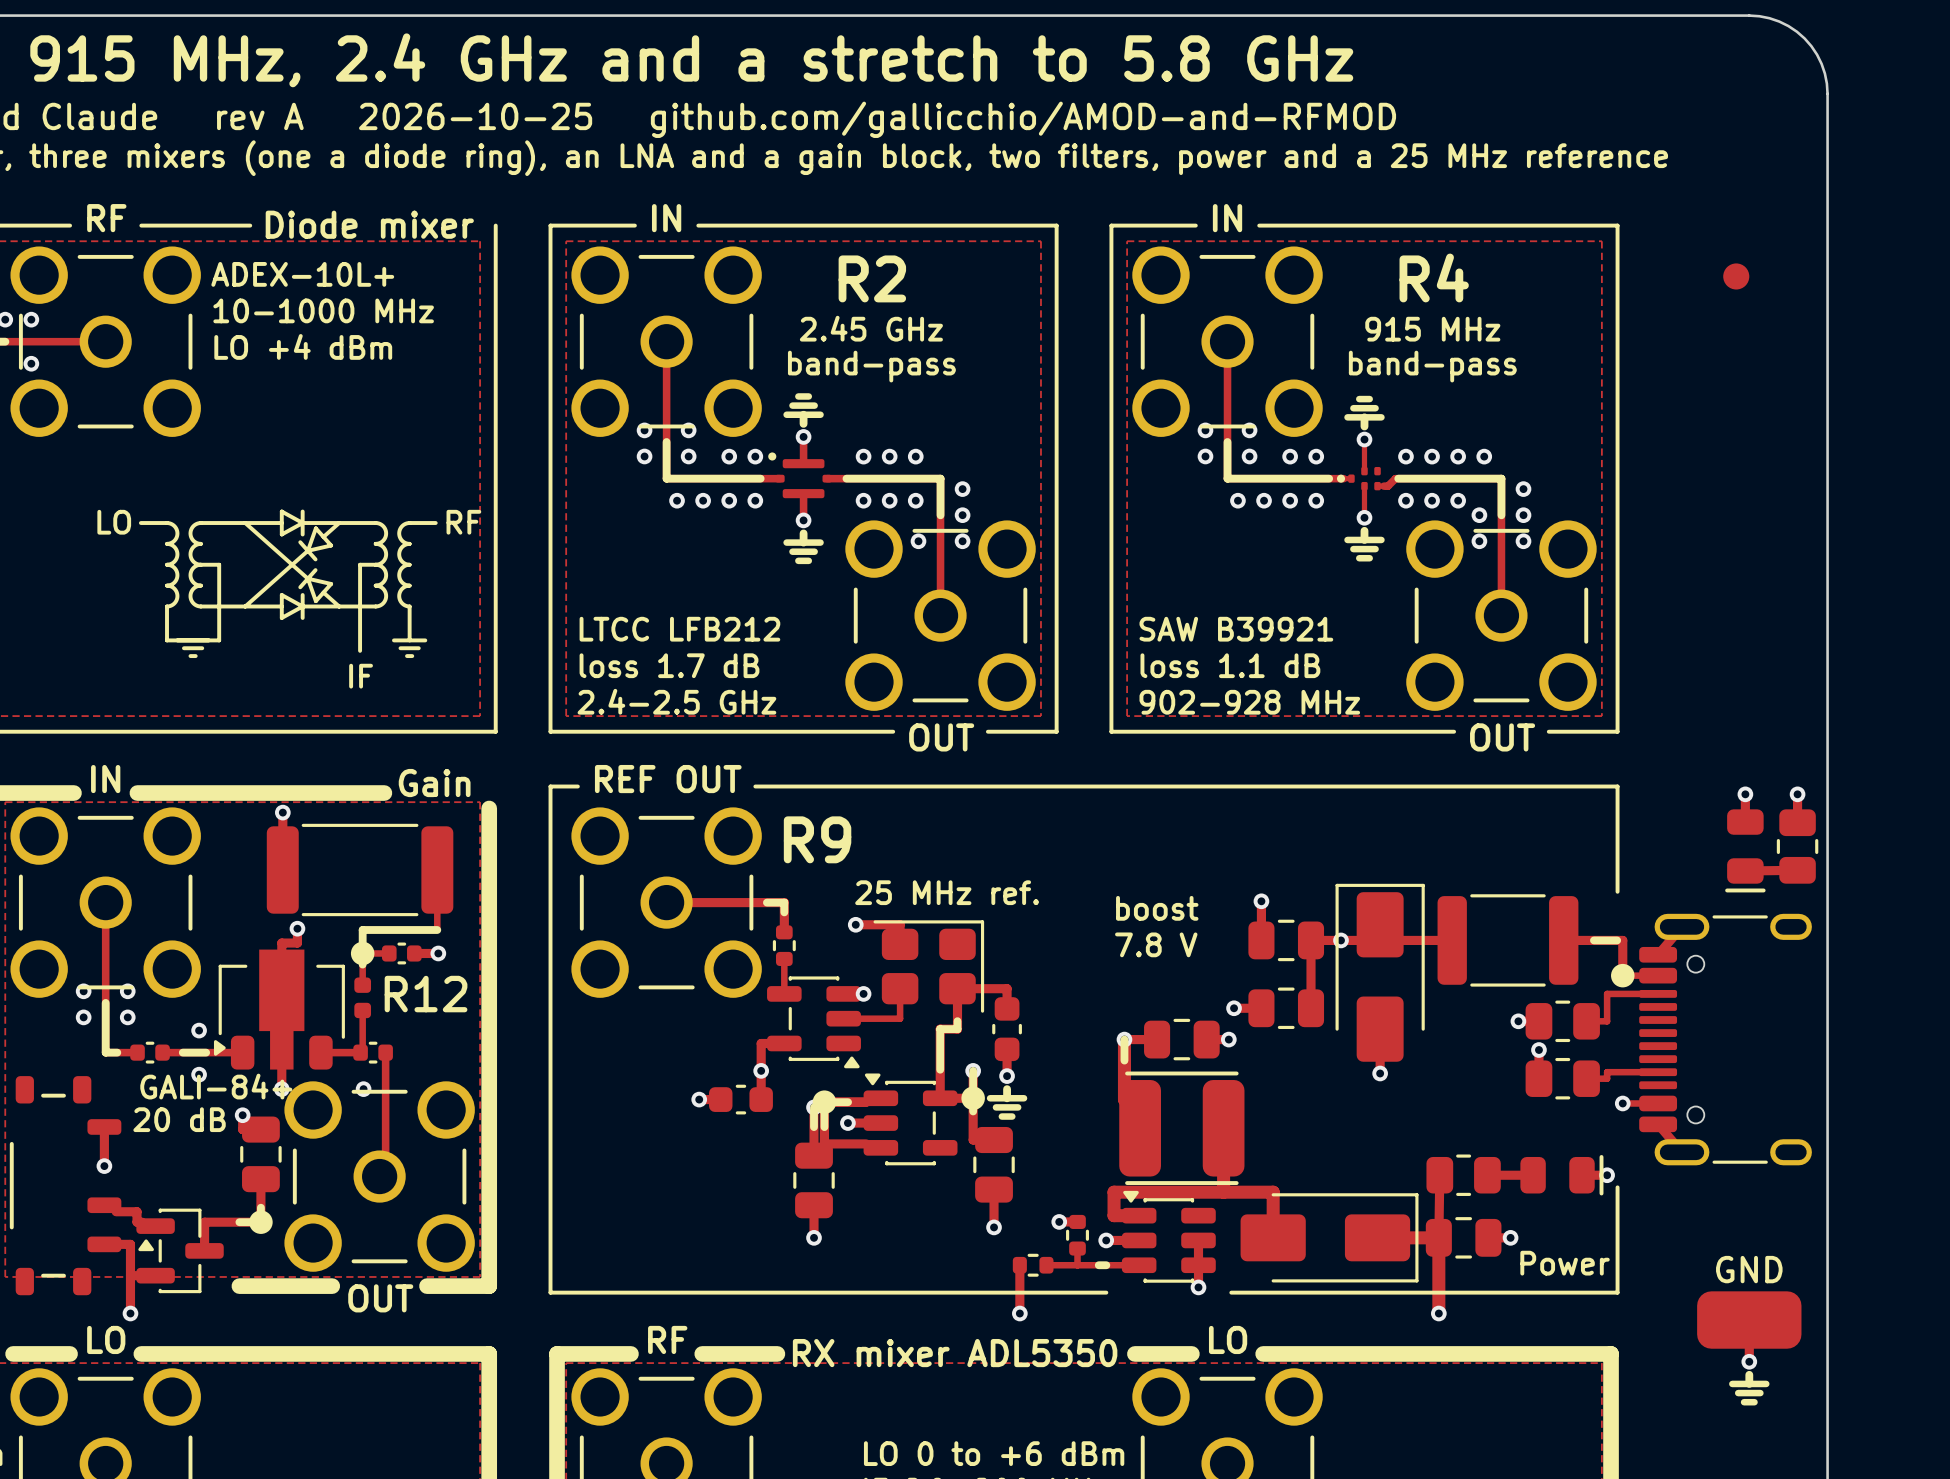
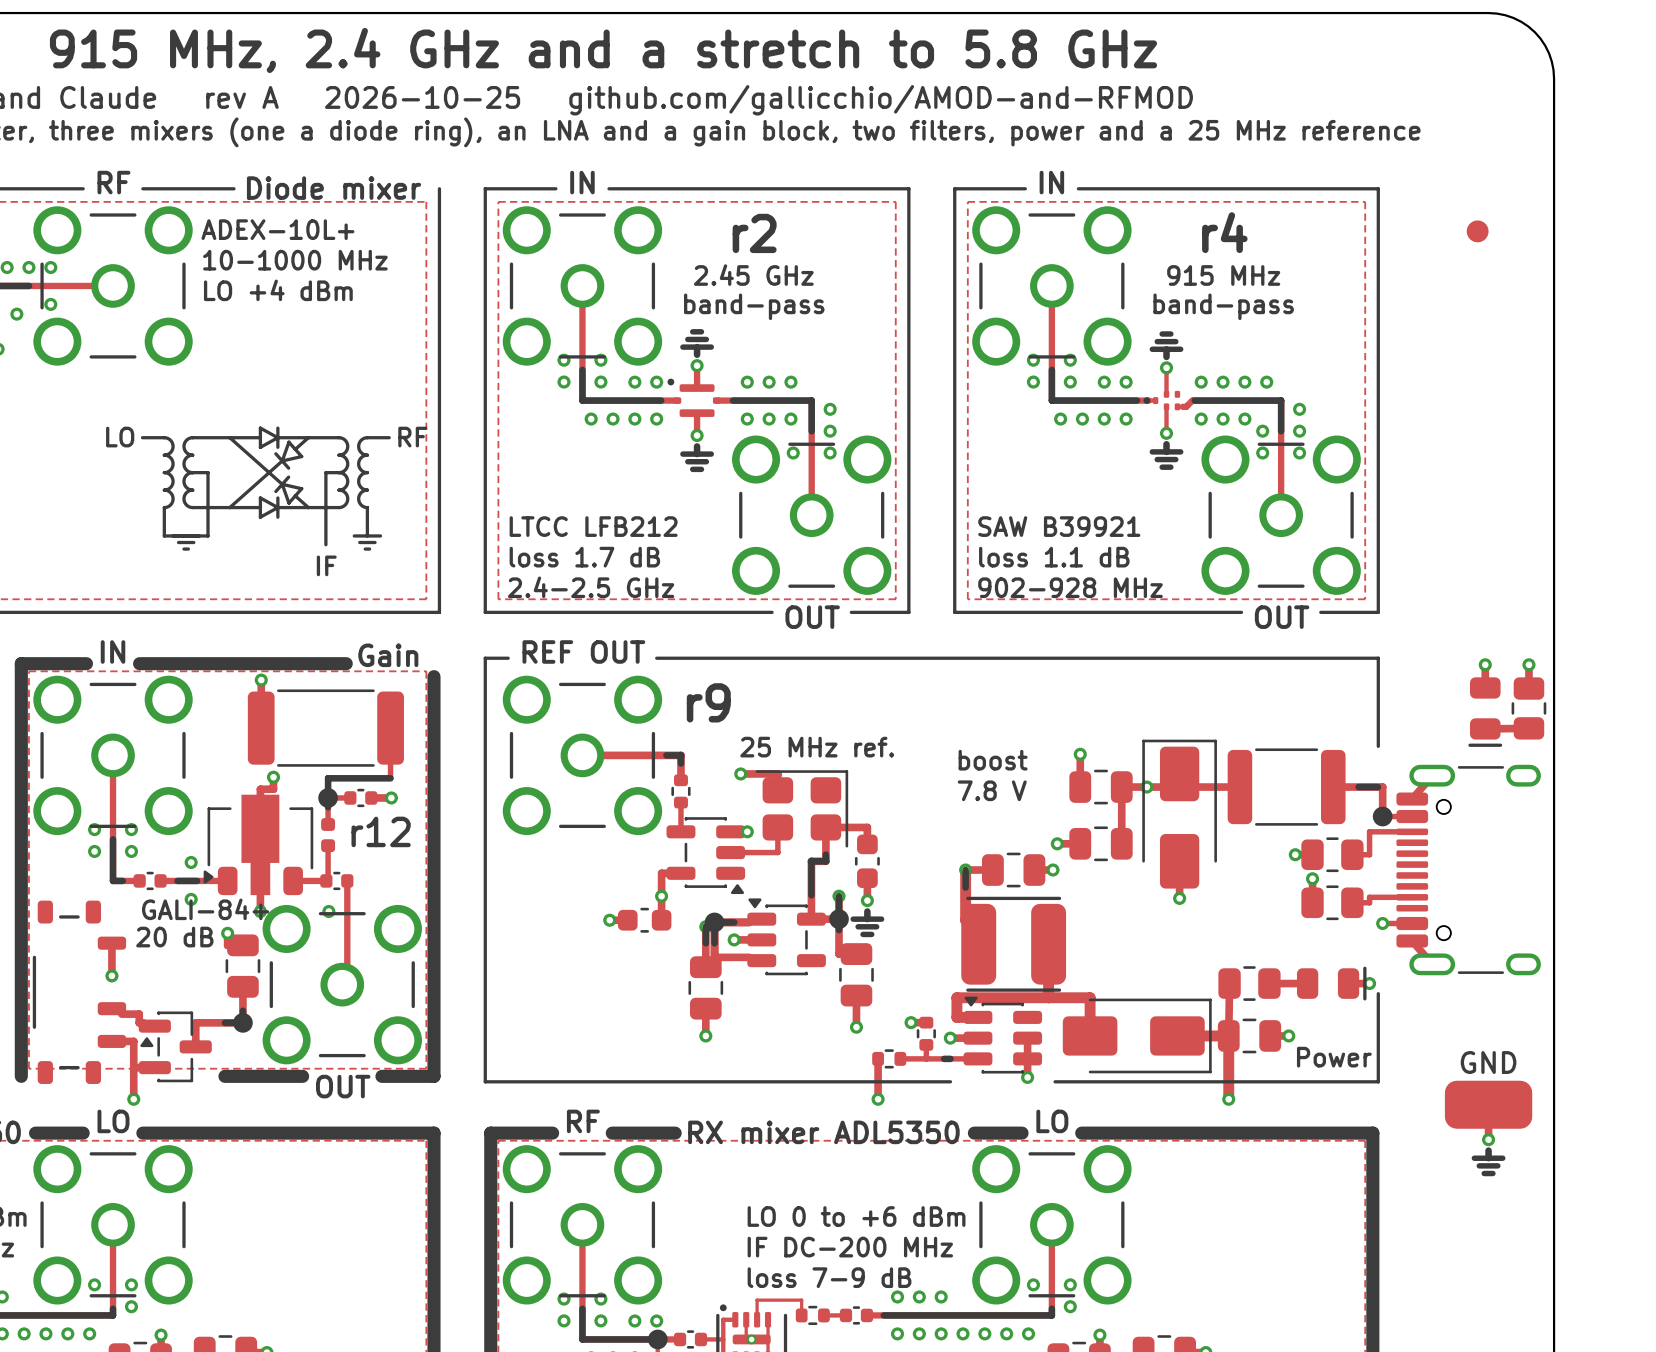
text: R4 (1434, 277) -> r4 (1224, 232)
text: R2 (872, 278) -> r2 (754, 233)
text: R9 (817, 839) -> r9 (708, 702)
text: R12 (426, 994) -> r12 (381, 831)

